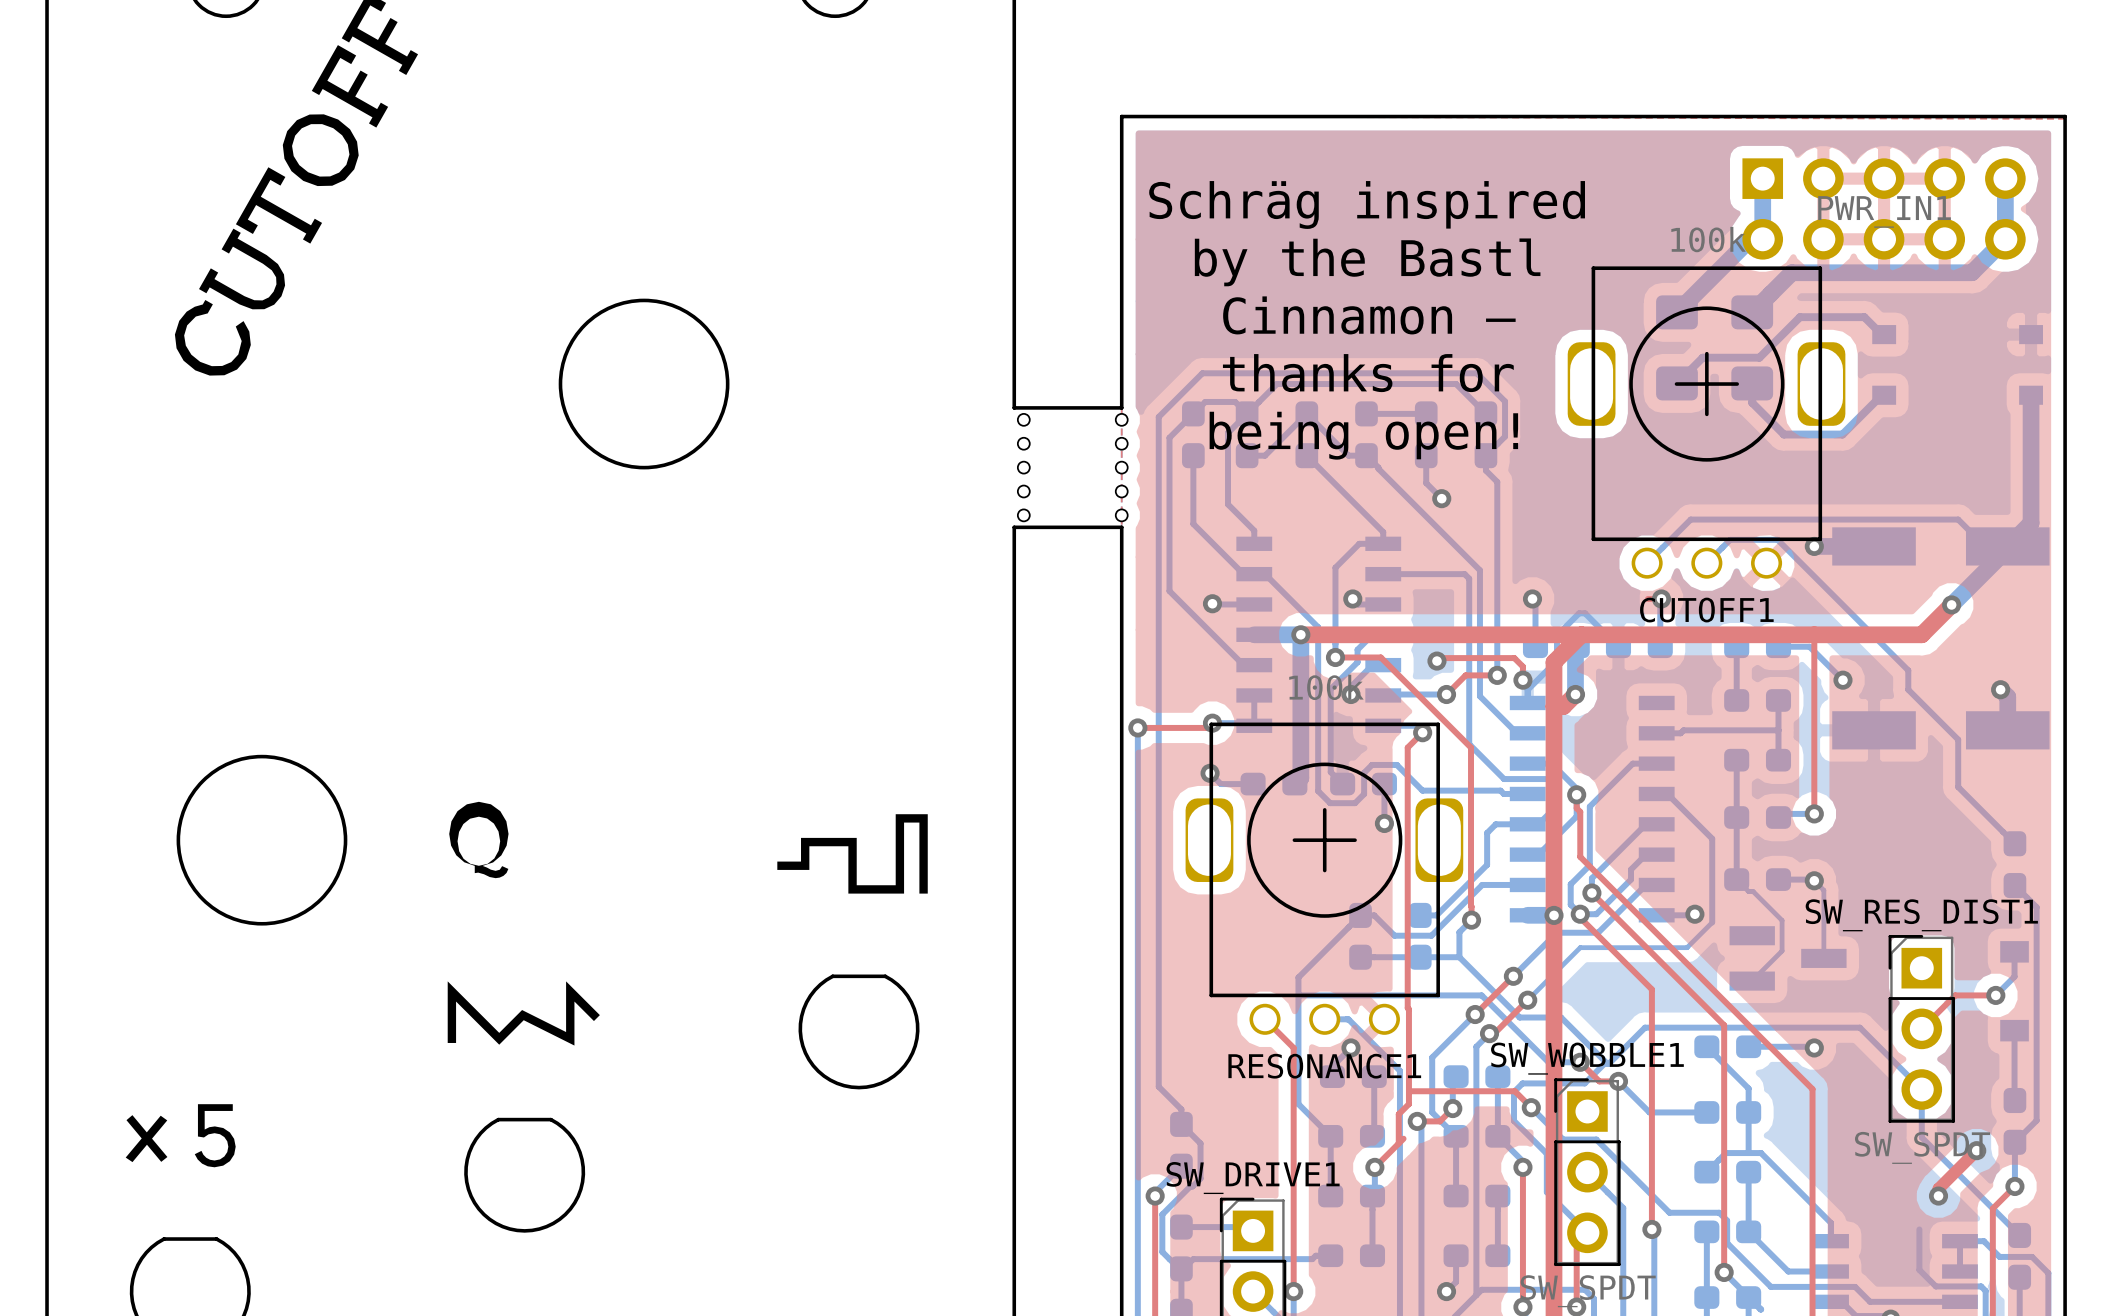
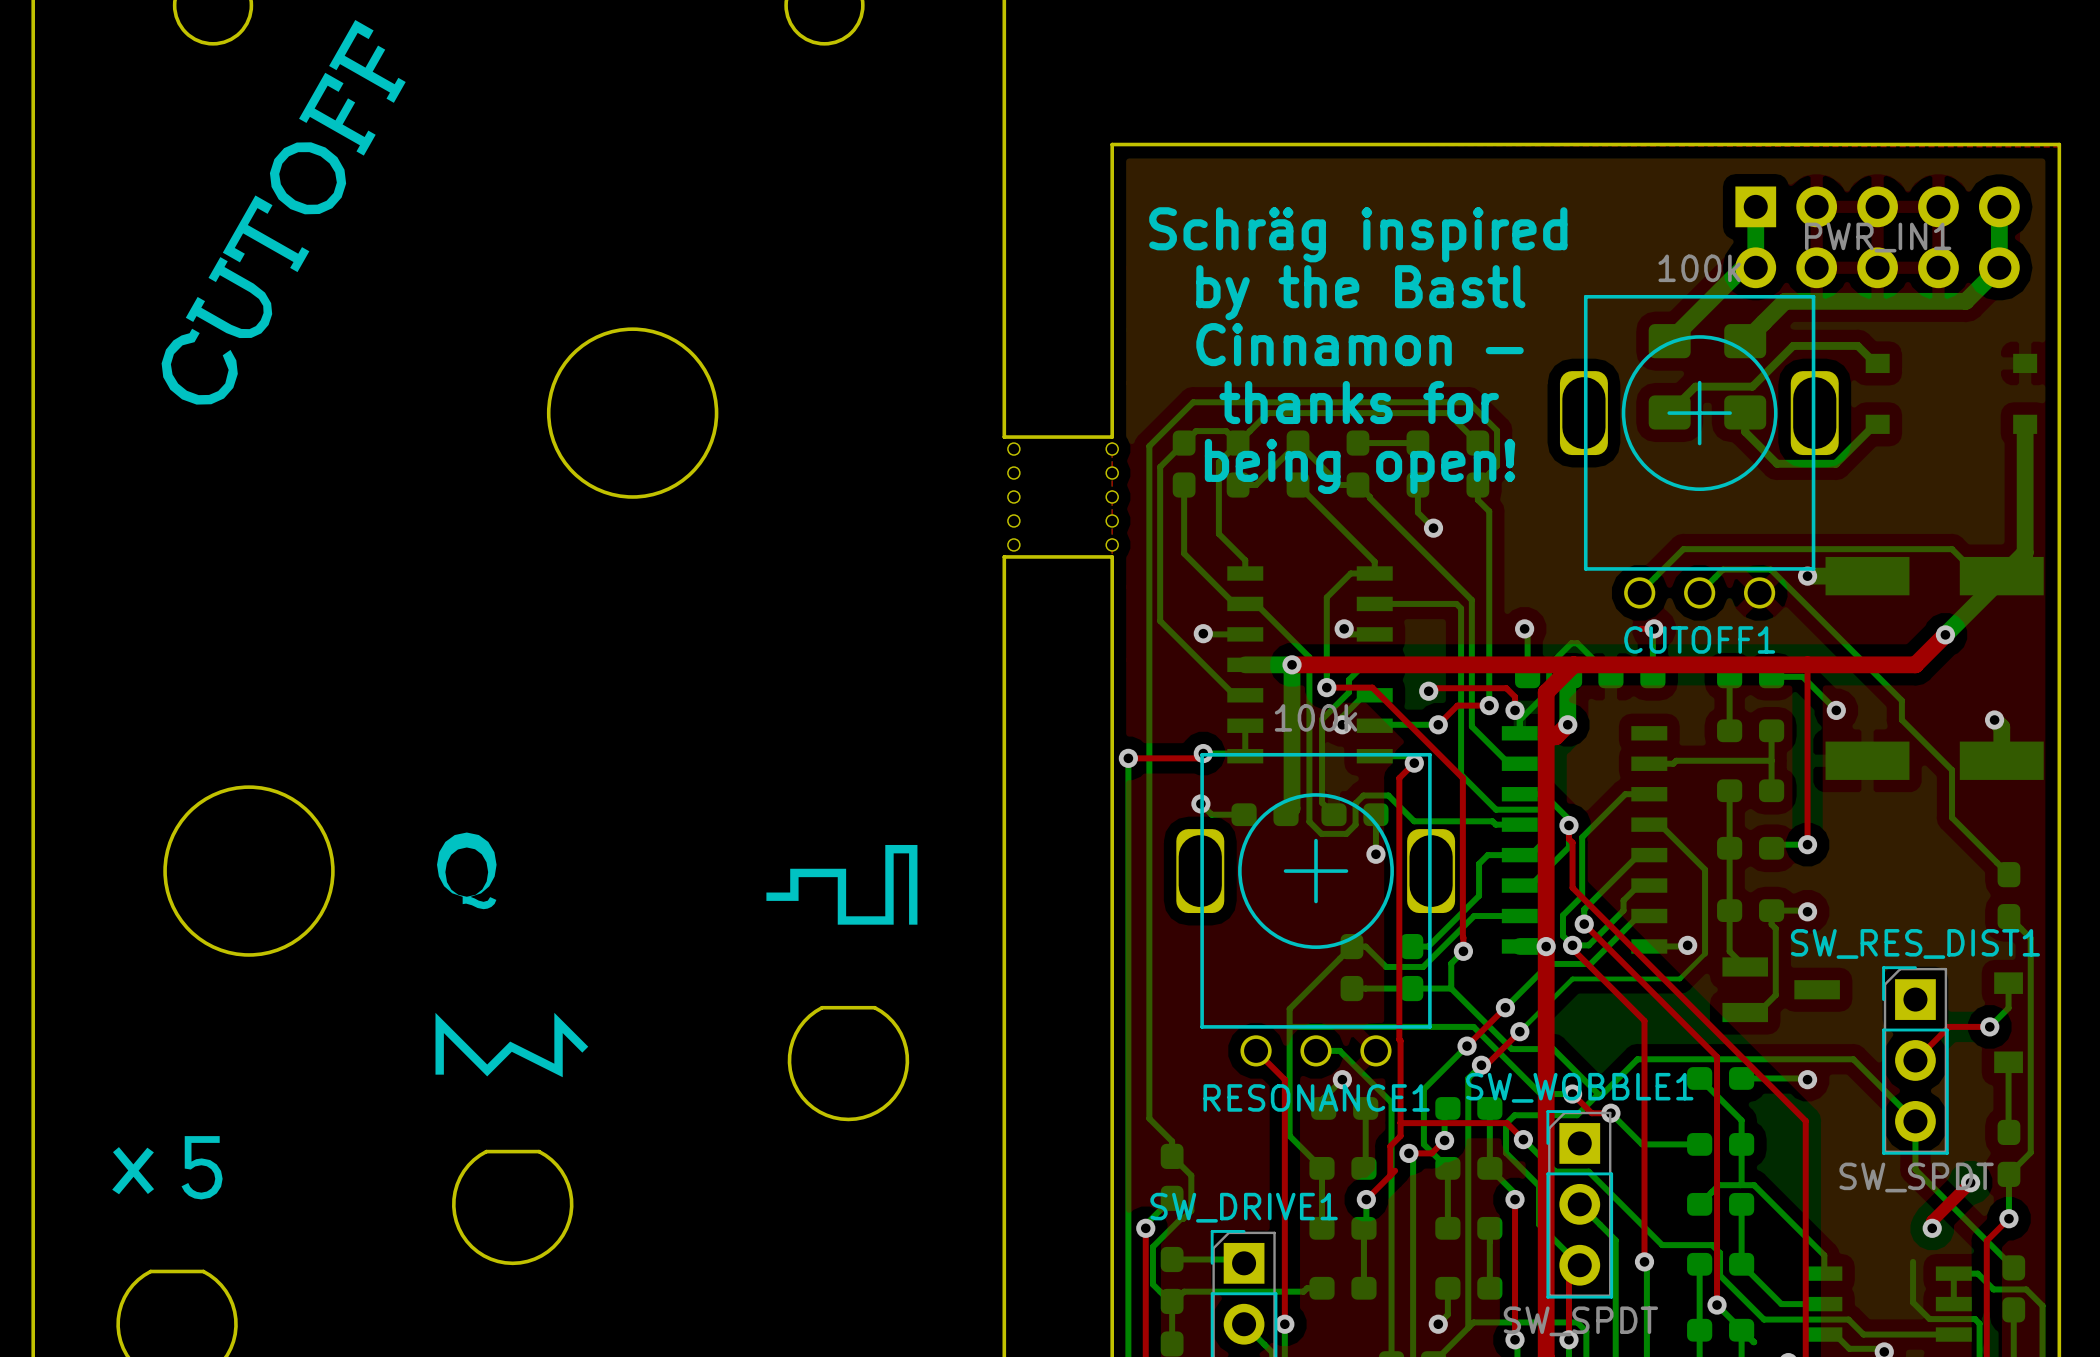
bottom track: (1736, 879) (1748, 891) (1753, 891) (1782, 920) (1782, 951) (1751, 981) -> (1771, 910) (1771, 924) (1775, 928) (1775, 995) (1758, 1012) (1745, 1012)
bottom track: none -> (1729, 910) (1729, 951) (1745, 966)
bottom track: (1814, 880) (1823, 890) (1823, 958) -> none

